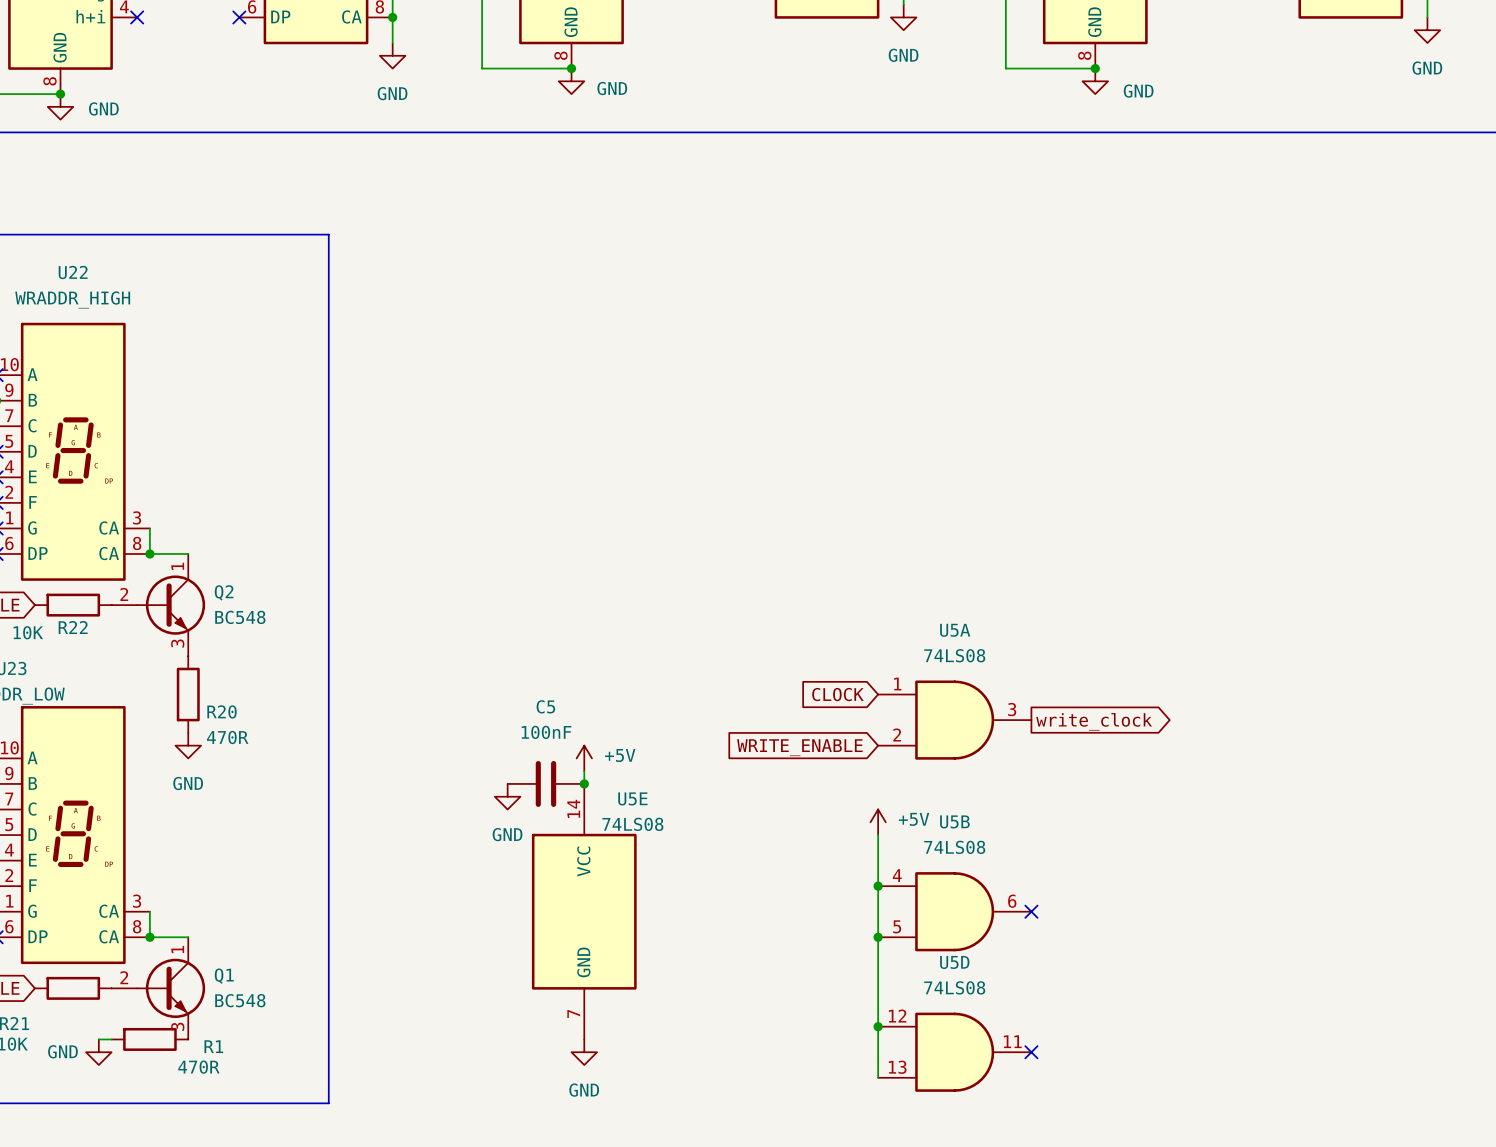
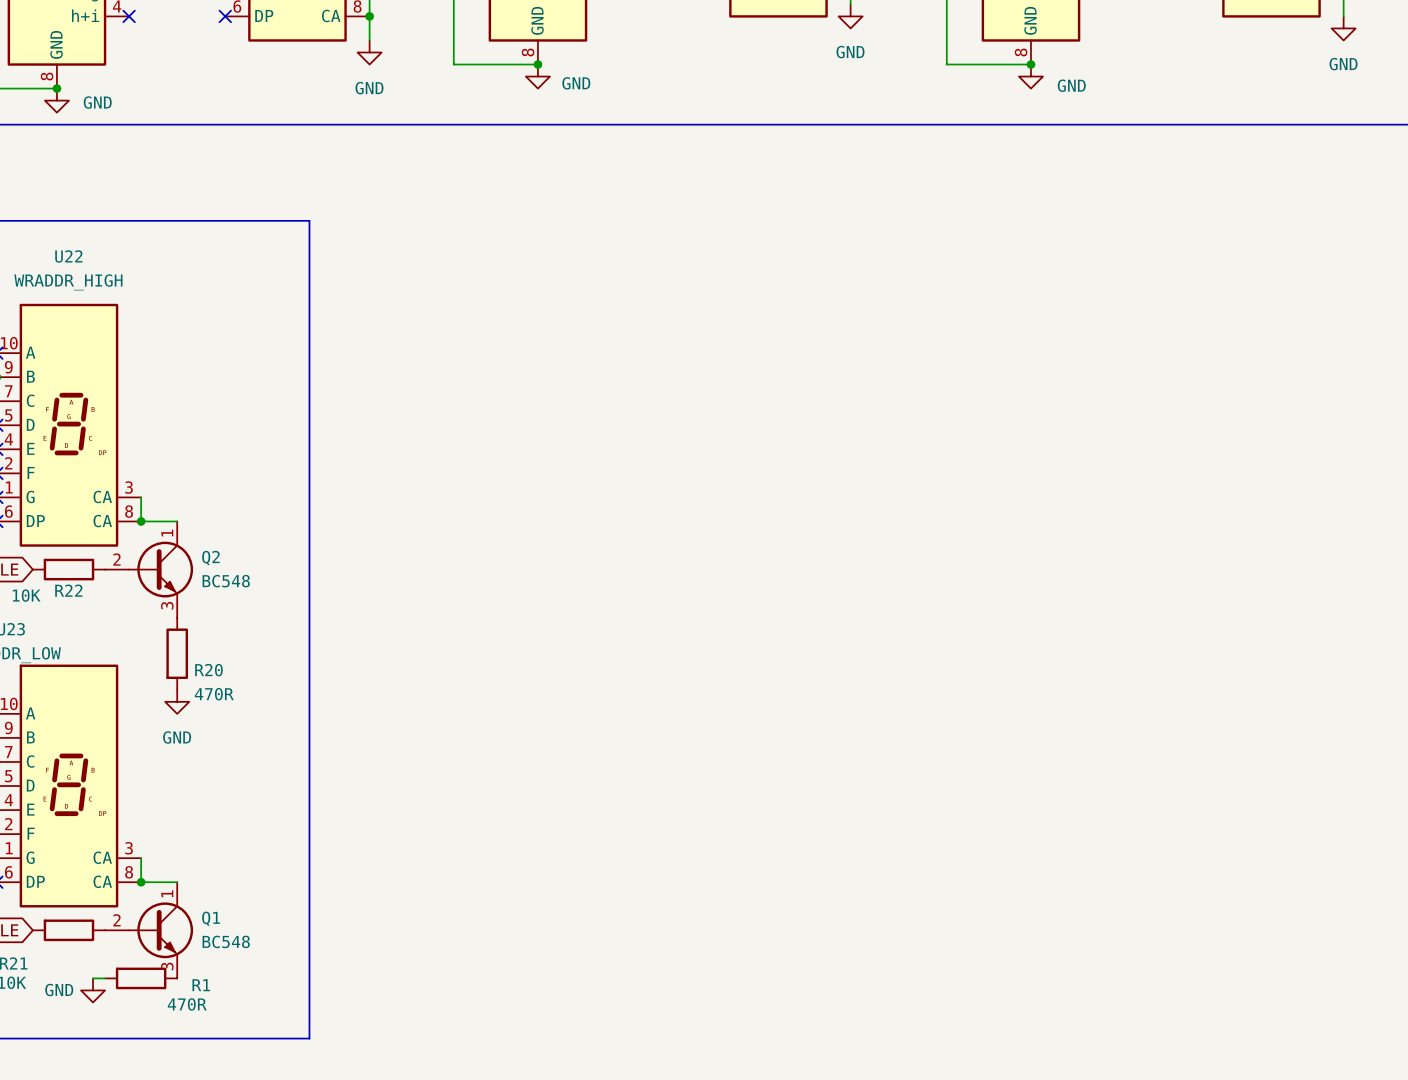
global label: CLOCK (837, 694) -> none
U5A: 74LS08 (954, 720) -> none
global label: write_clock (1094, 721) -> none
global label: WRITE_ENABLE (799, 747) -> none
power symbol: +5V (584, 758) -> none
wire: (584, 771) (584, 783) -> none
C5: 100nF (545, 783) -> none
junction: (584, 783) -> none
power symbol: GND (507, 796) -> none
power symbol: +5V (878, 822) -> none
wire: (878, 835) (878, 1077) -> none
junction: (878, 886) -> none
U5E: 74LS08 (584, 911) -> none
U5B: 74LS08 (954, 911) -> none
no-connect mark: (1031, 911) -> none
junction: (878, 937) -> none
junction: (878, 1026) -> none
power symbol: GND (584, 1052) -> none
U5D: 74LS08 (954, 1052) -> none
no-connect mark: (1031, 1052) -> none

